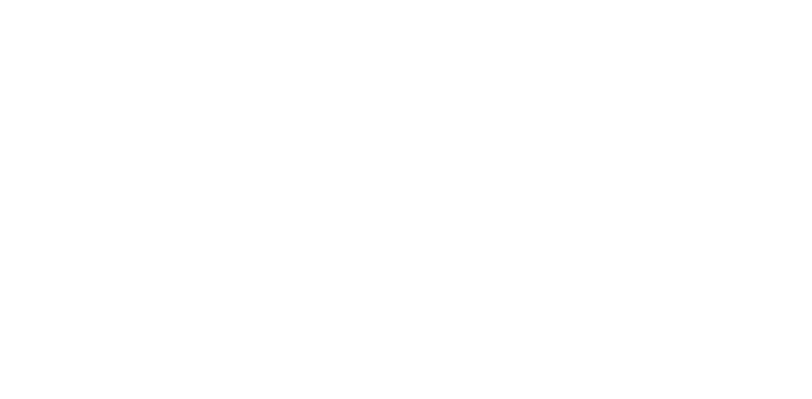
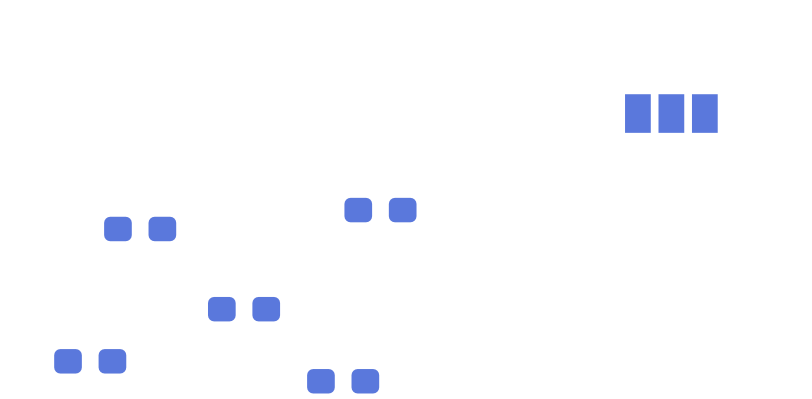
part: none -> (671, 113)
part: none -> (380, 210)
part: none -> (140, 228)
part: none -> (244, 309)
part: none -> (90, 361)
part: none -> (343, 381)

